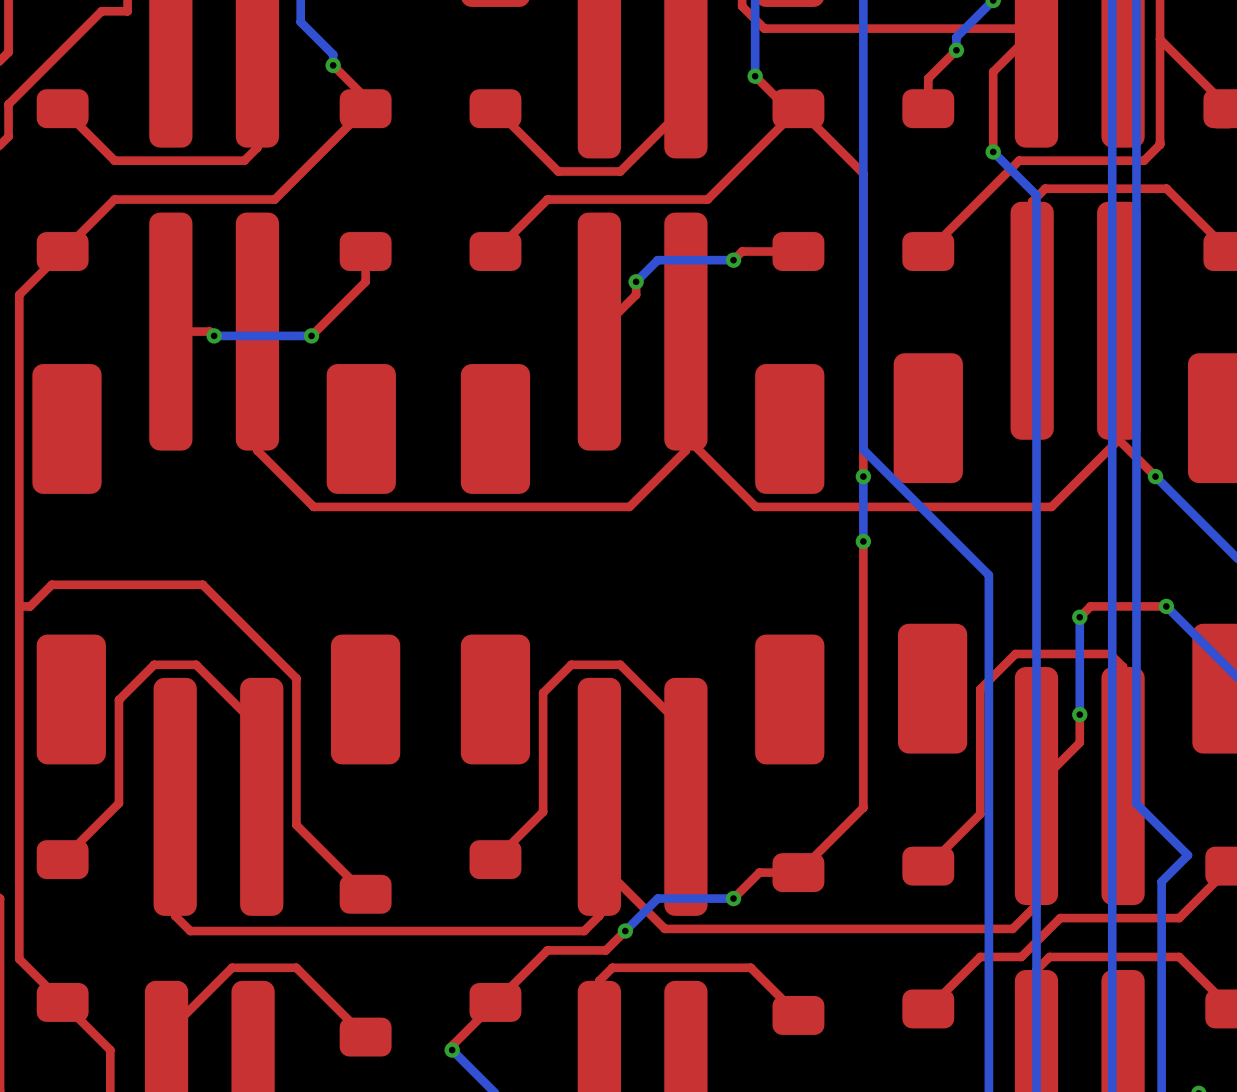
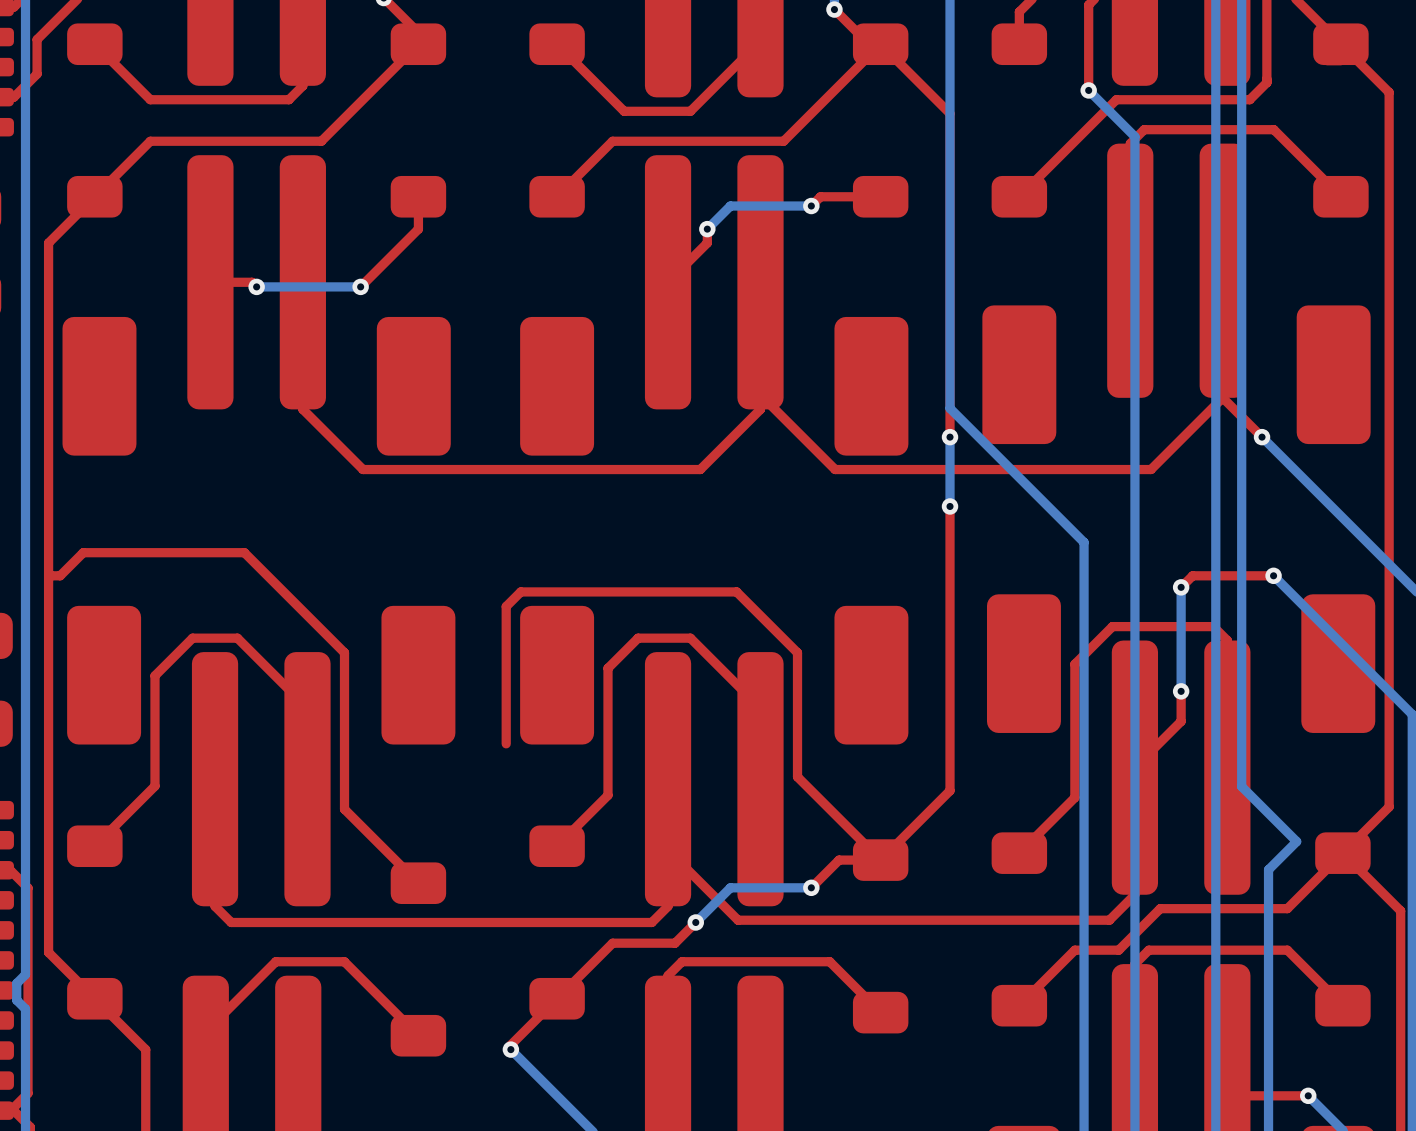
top track: none -> (506, 743) (506, 606) (520, 591) (736, 591) (797, 652) (797, 776) (880, 860)

